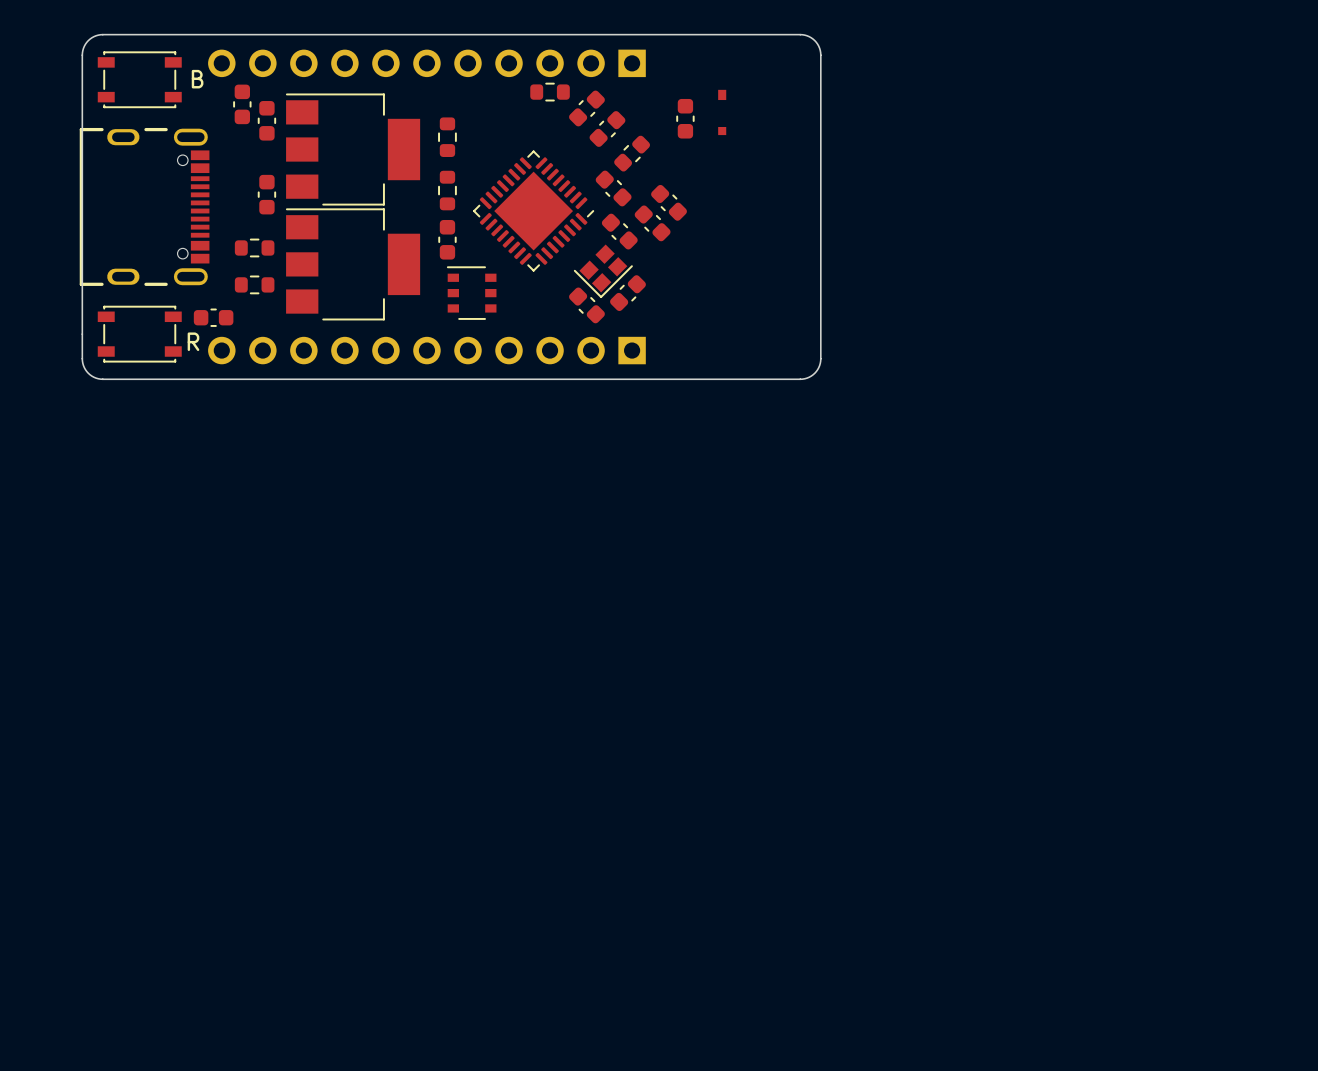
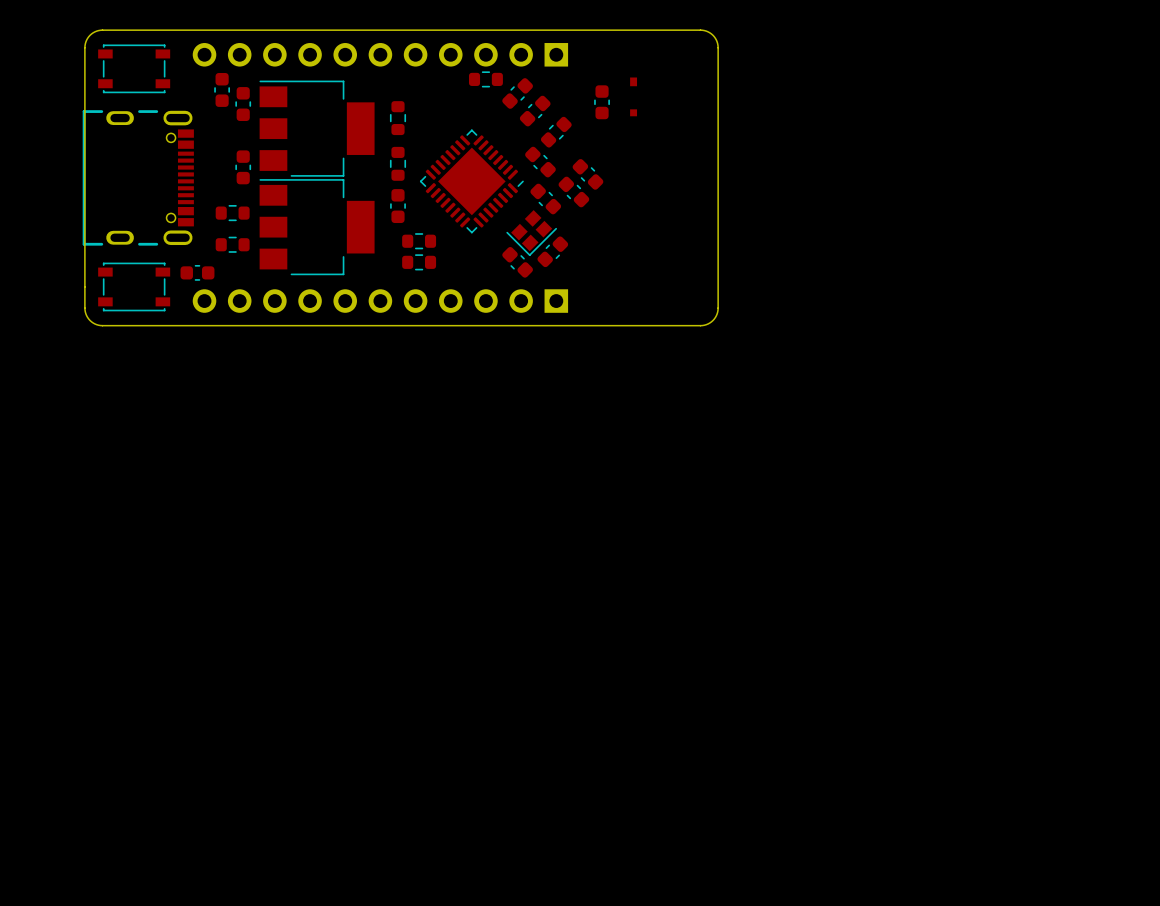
text: B (197, 79) -> none
part: none -> (419, 241)
part: (471, 293) -> none
part: none -> (419, 262)
text: R (193, 341) -> none

